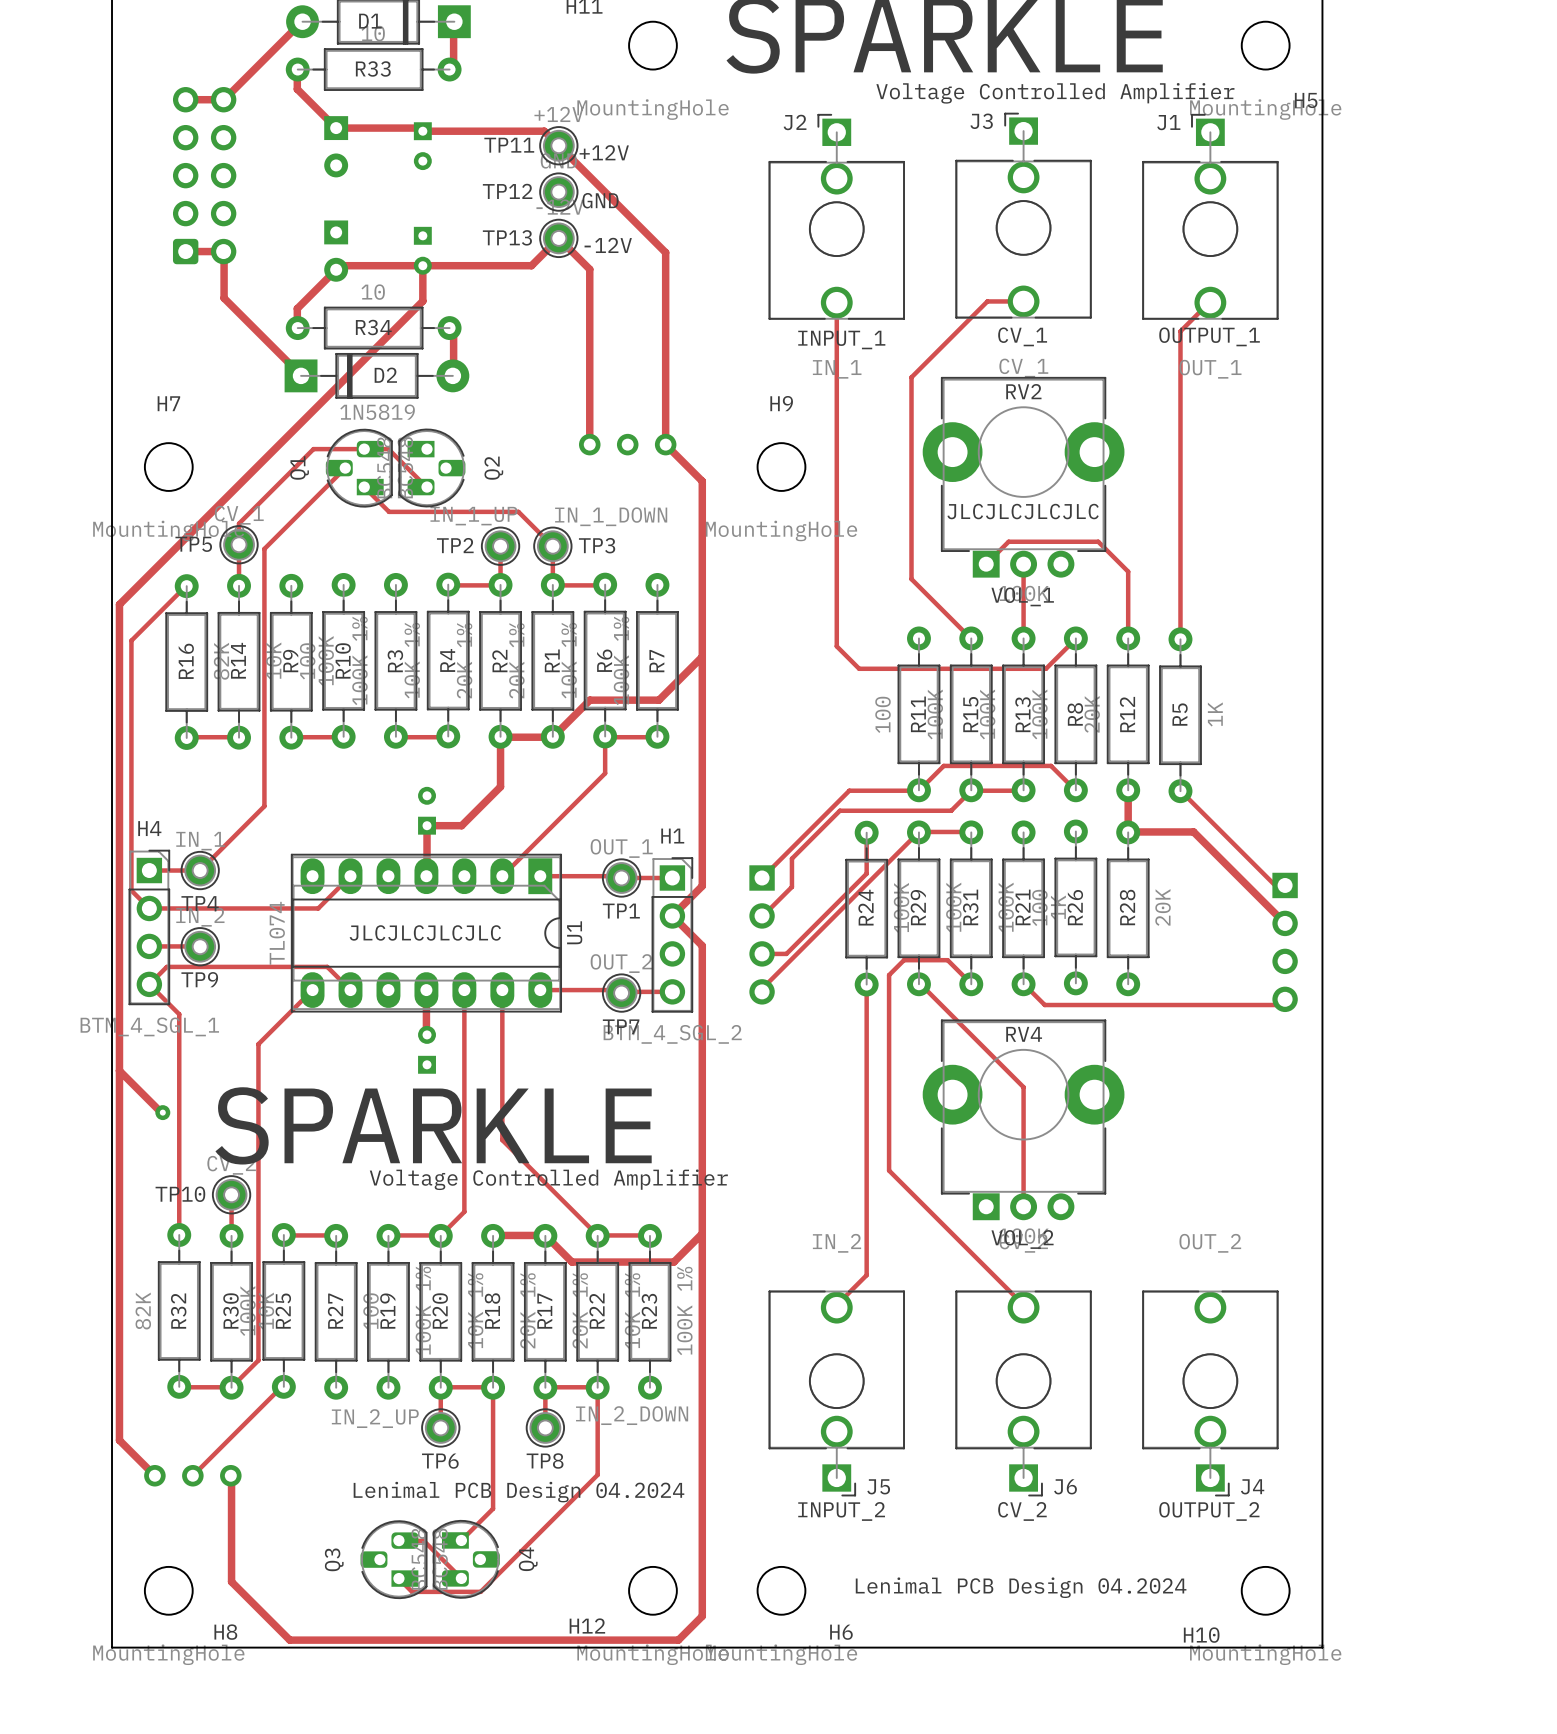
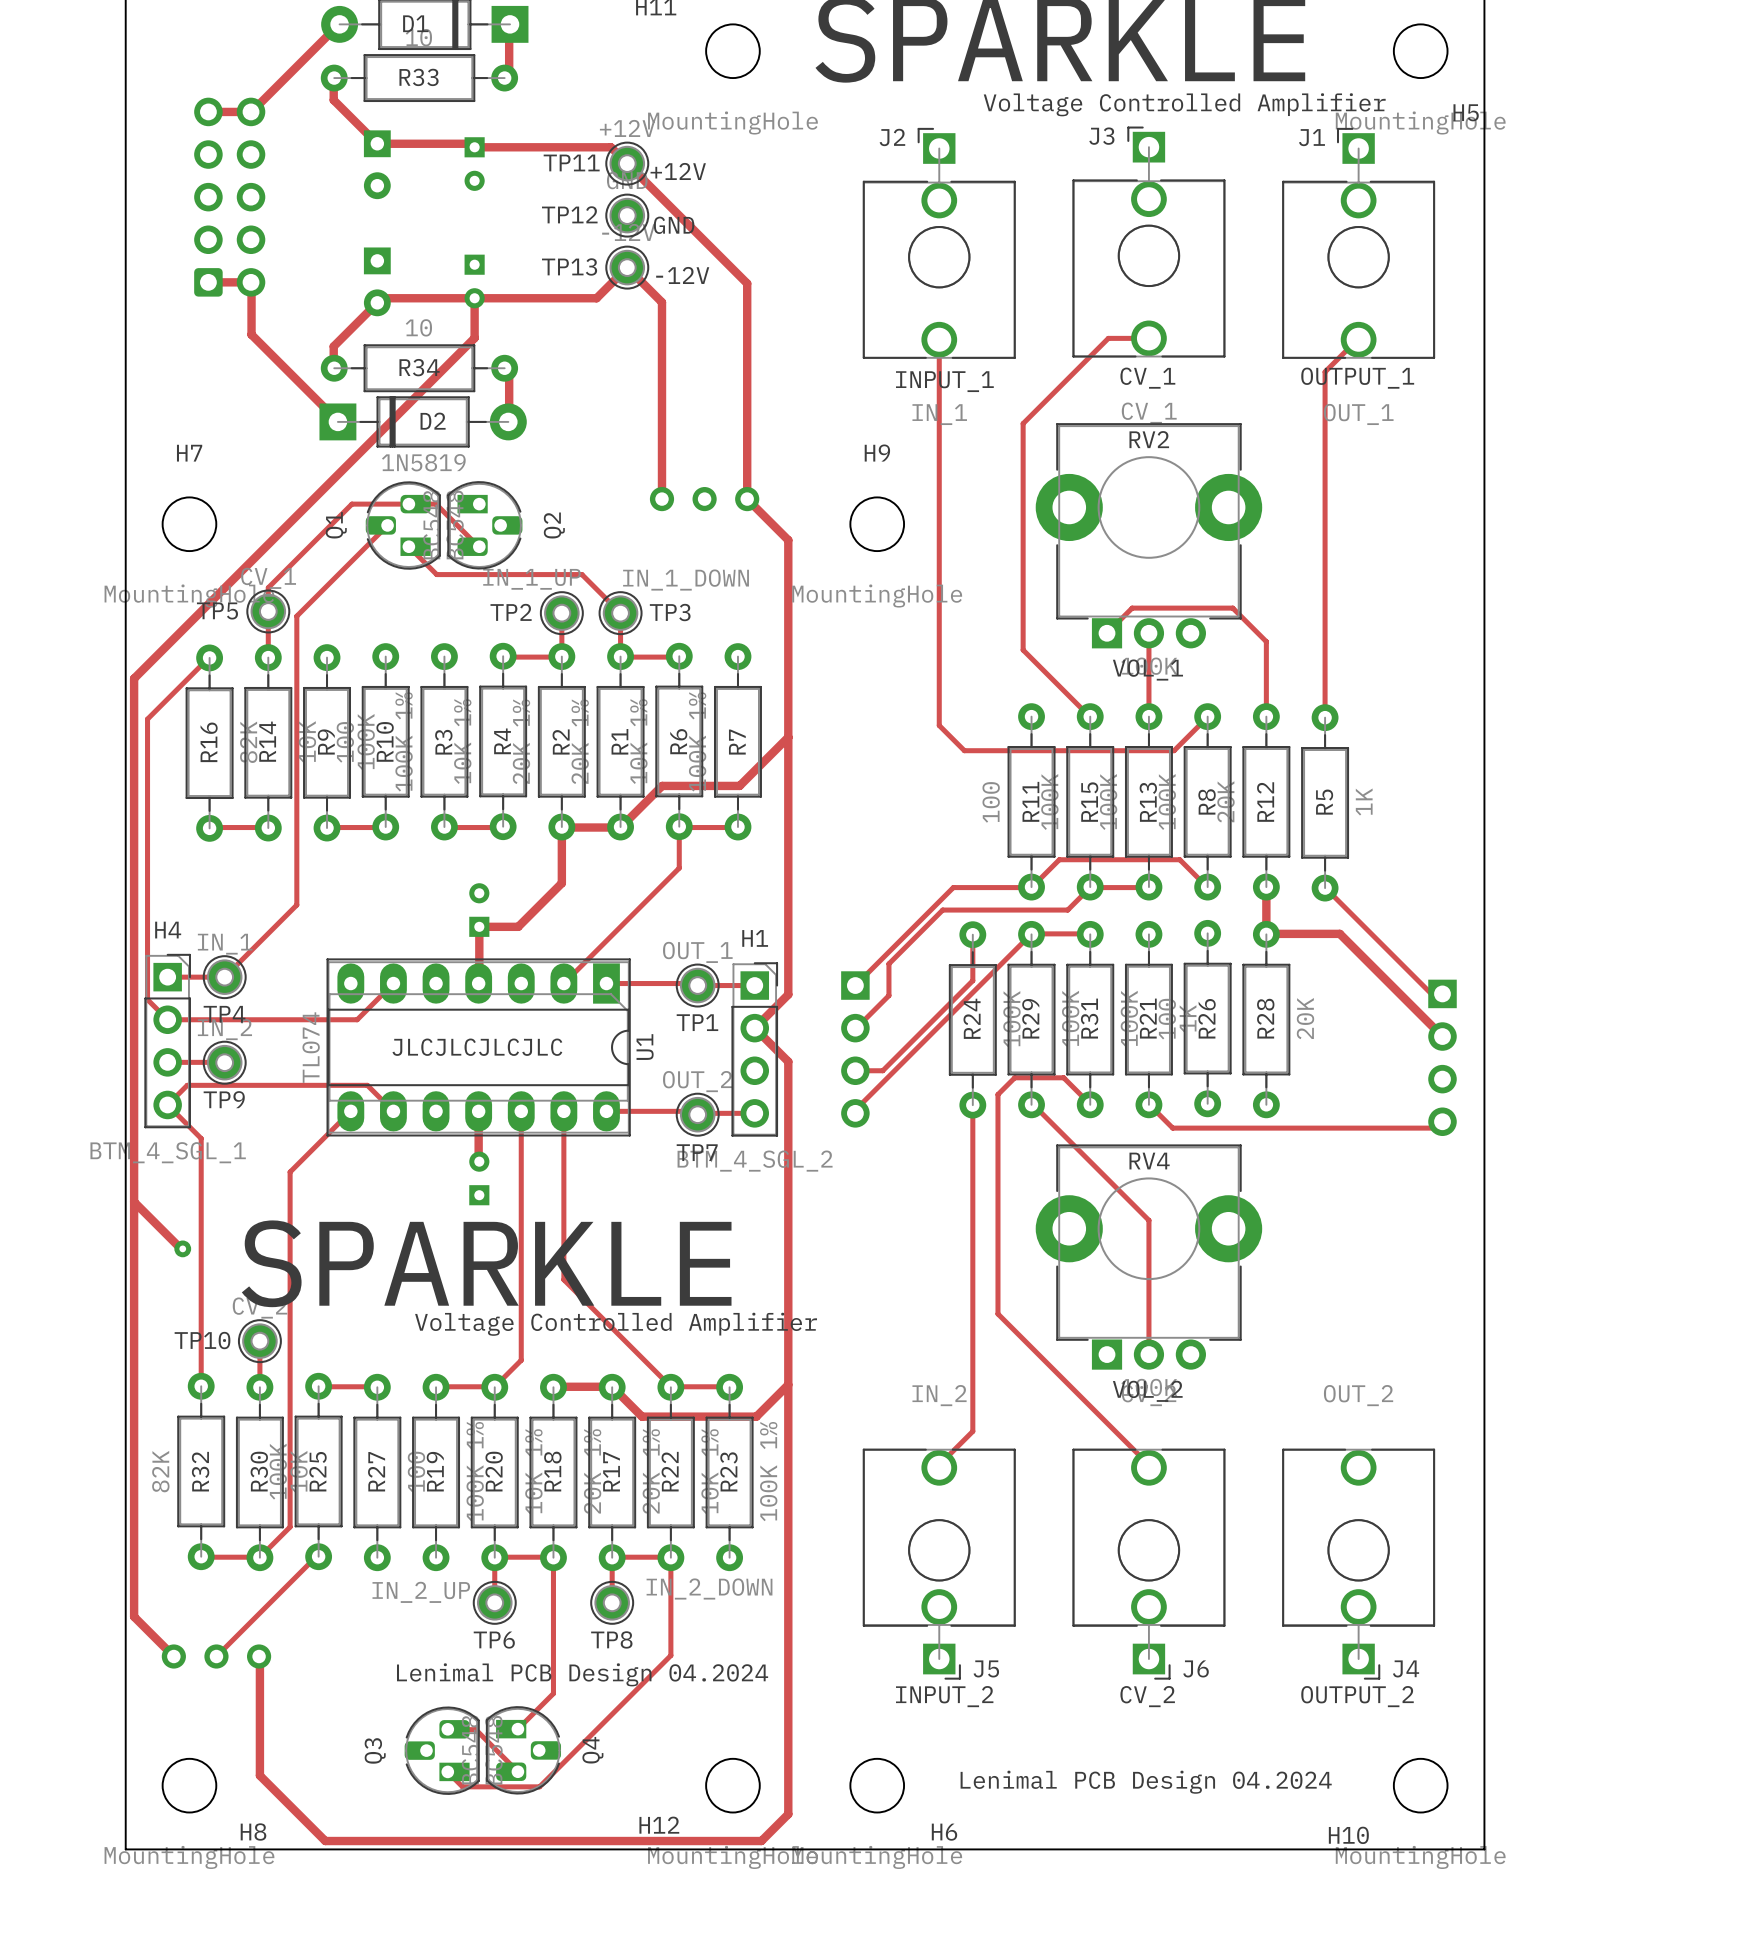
text: JLCJLCJLCJLC (1023, 511) -> none

